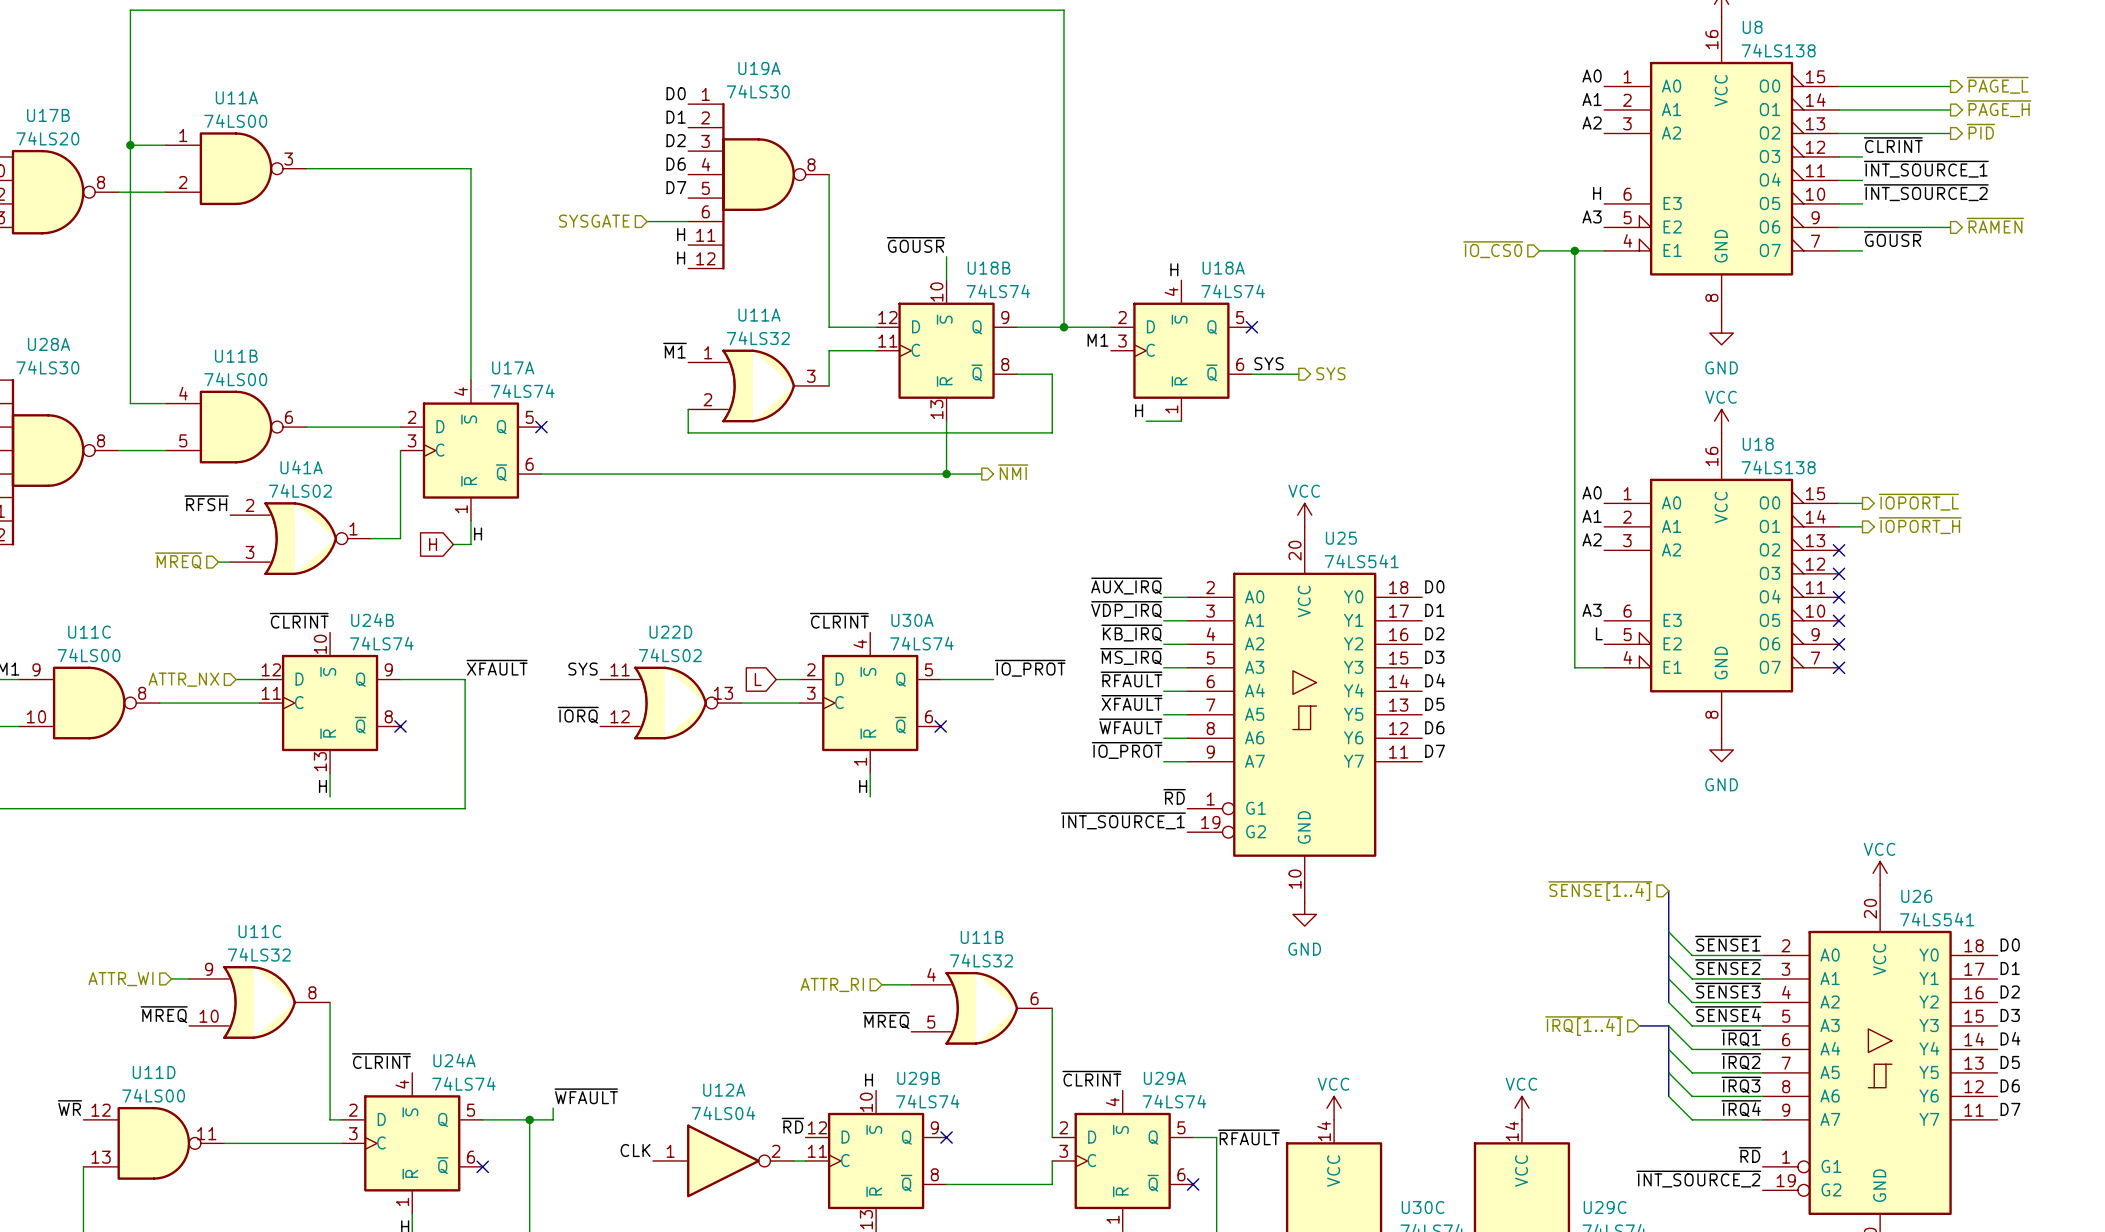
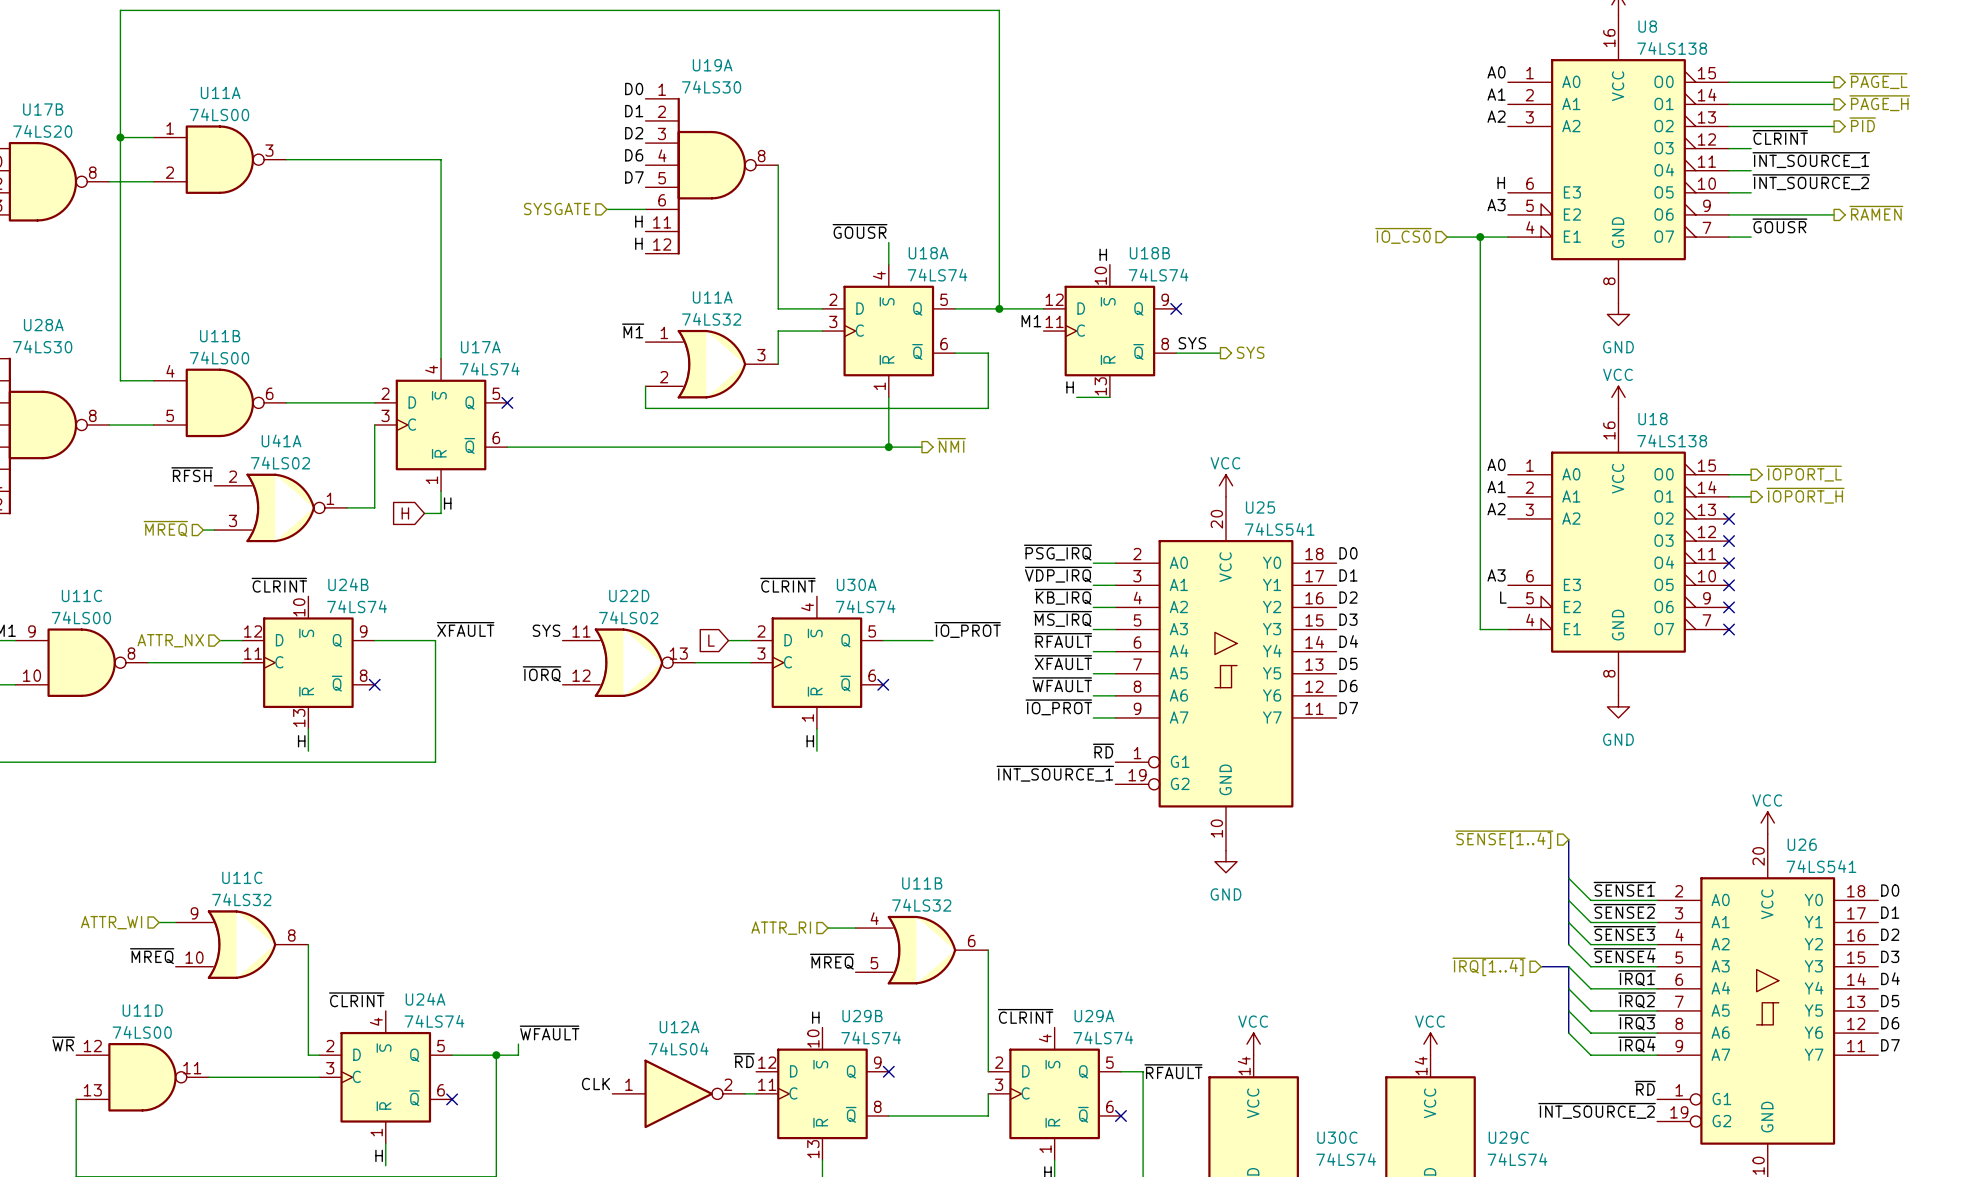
U18B position: (946, 350) -> (1109, 331)
U18A position: (1181, 350) -> (888, 331)
label: ~{AUX_IRQ} (1126, 586) -> ~{PSG_IRQ} (1057, 552)

